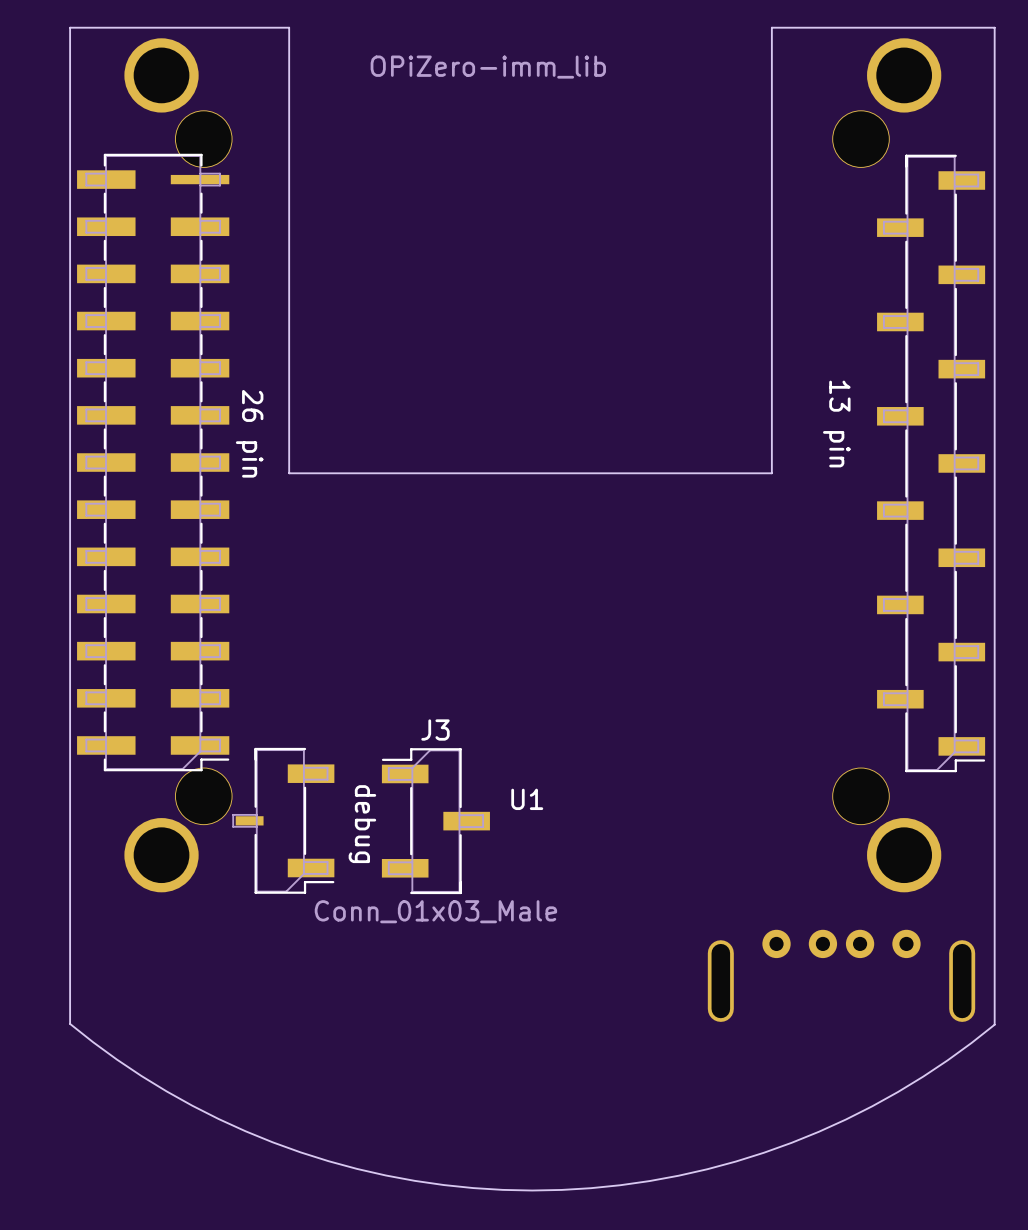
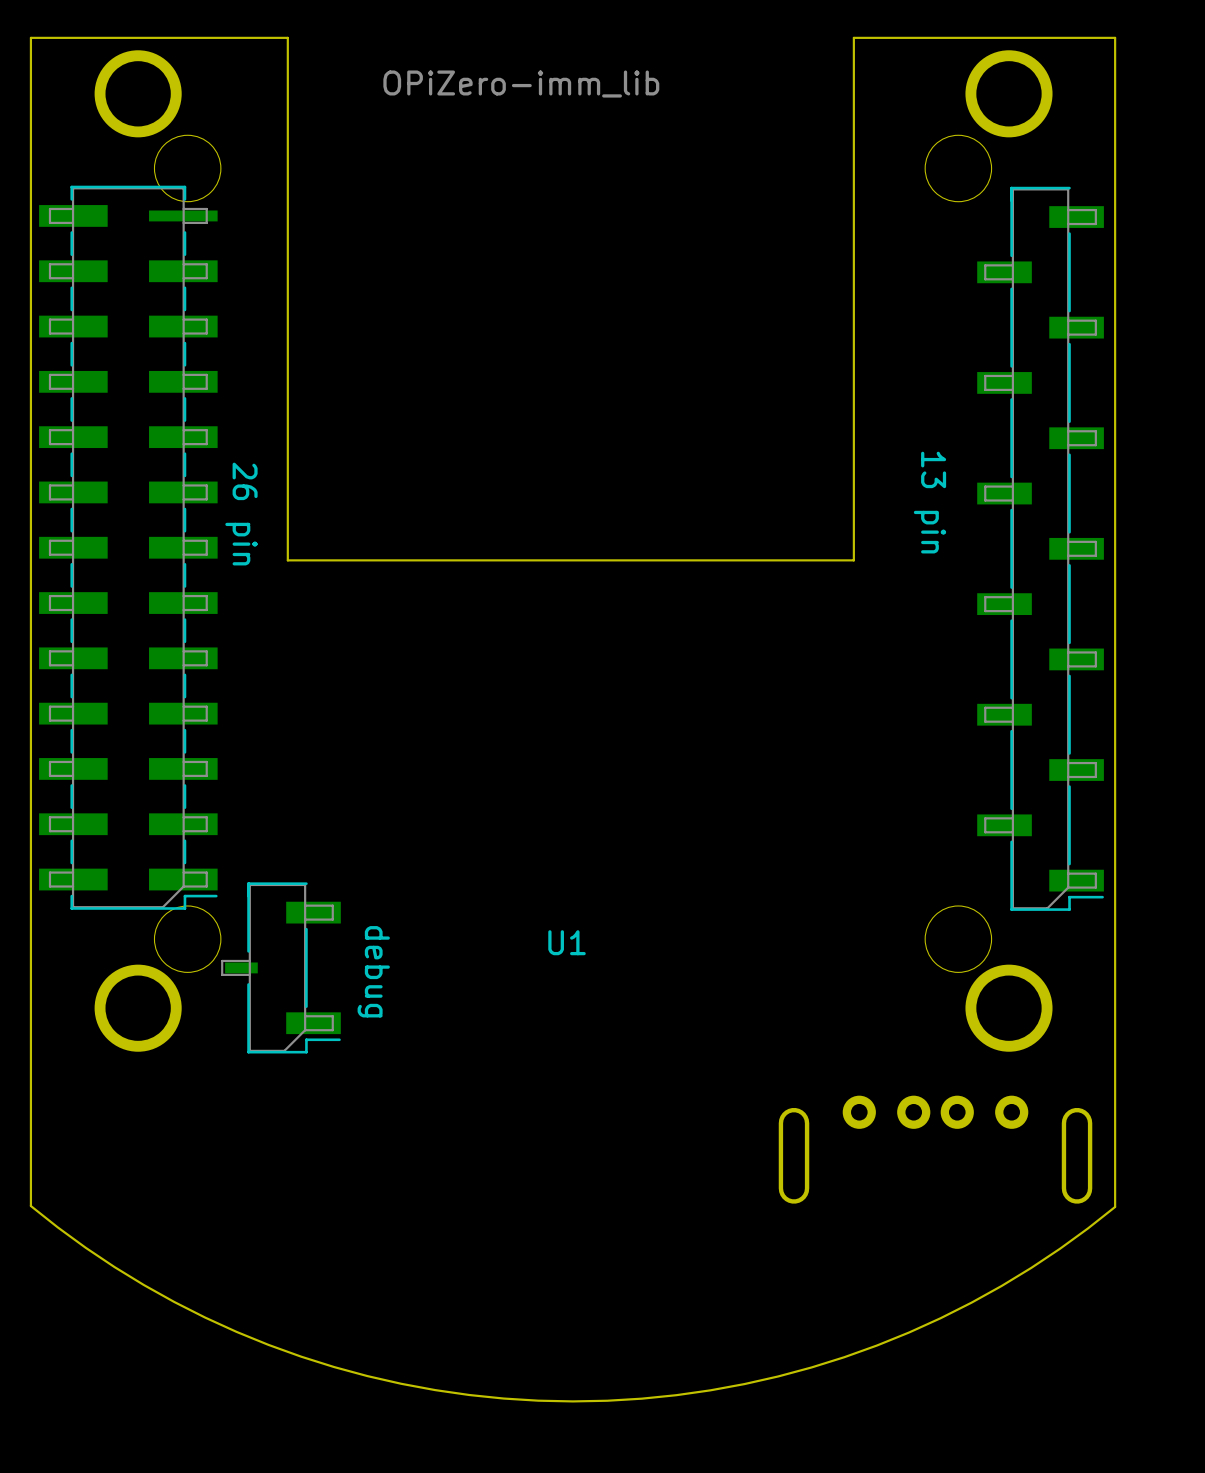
J3: Conn_01x03_Male (435, 821) -> none

